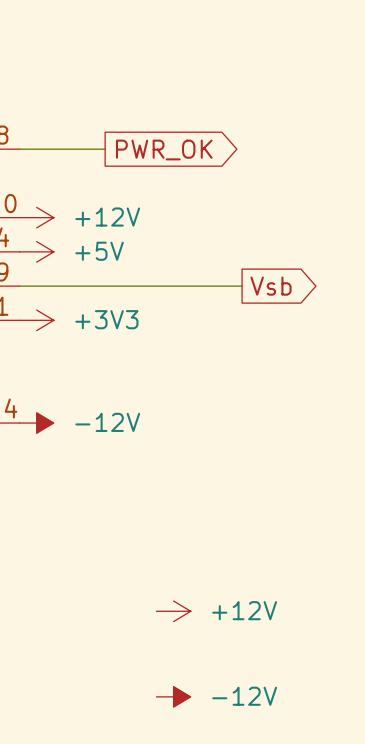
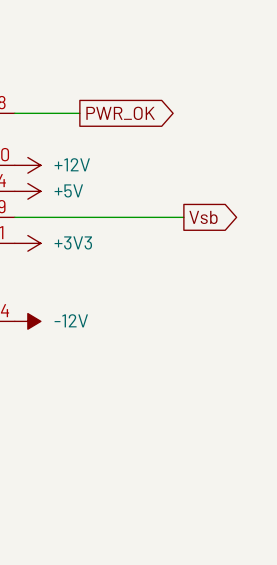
power symbol: +12V (173, 611) -> none
power symbol: -12V (173, 696) -> none

